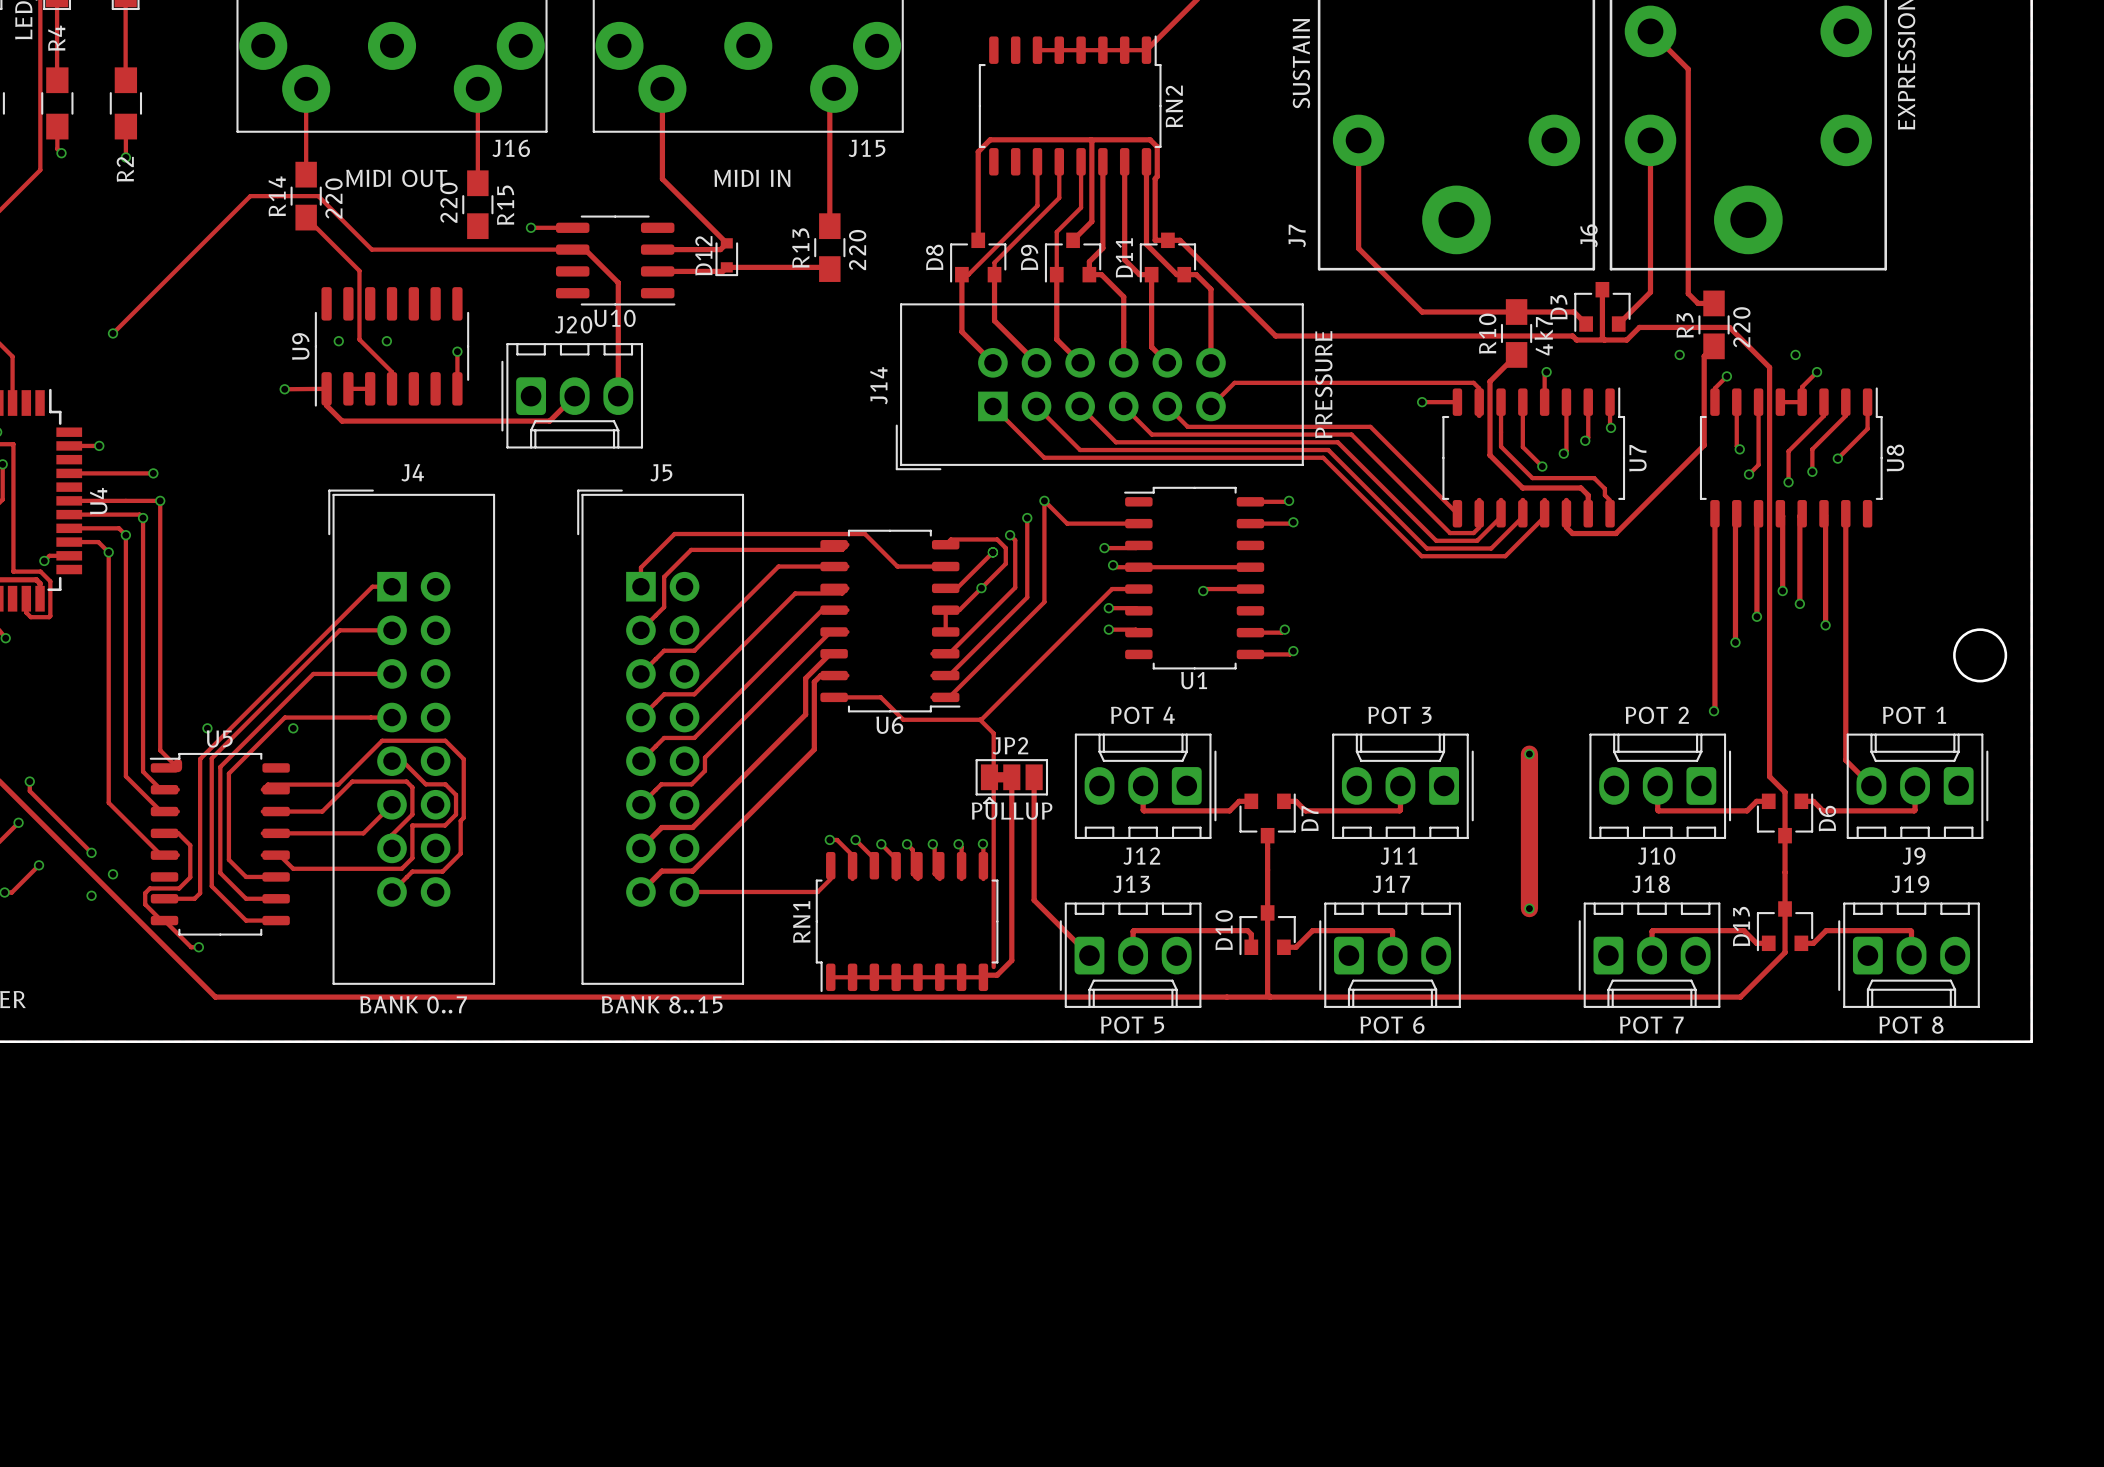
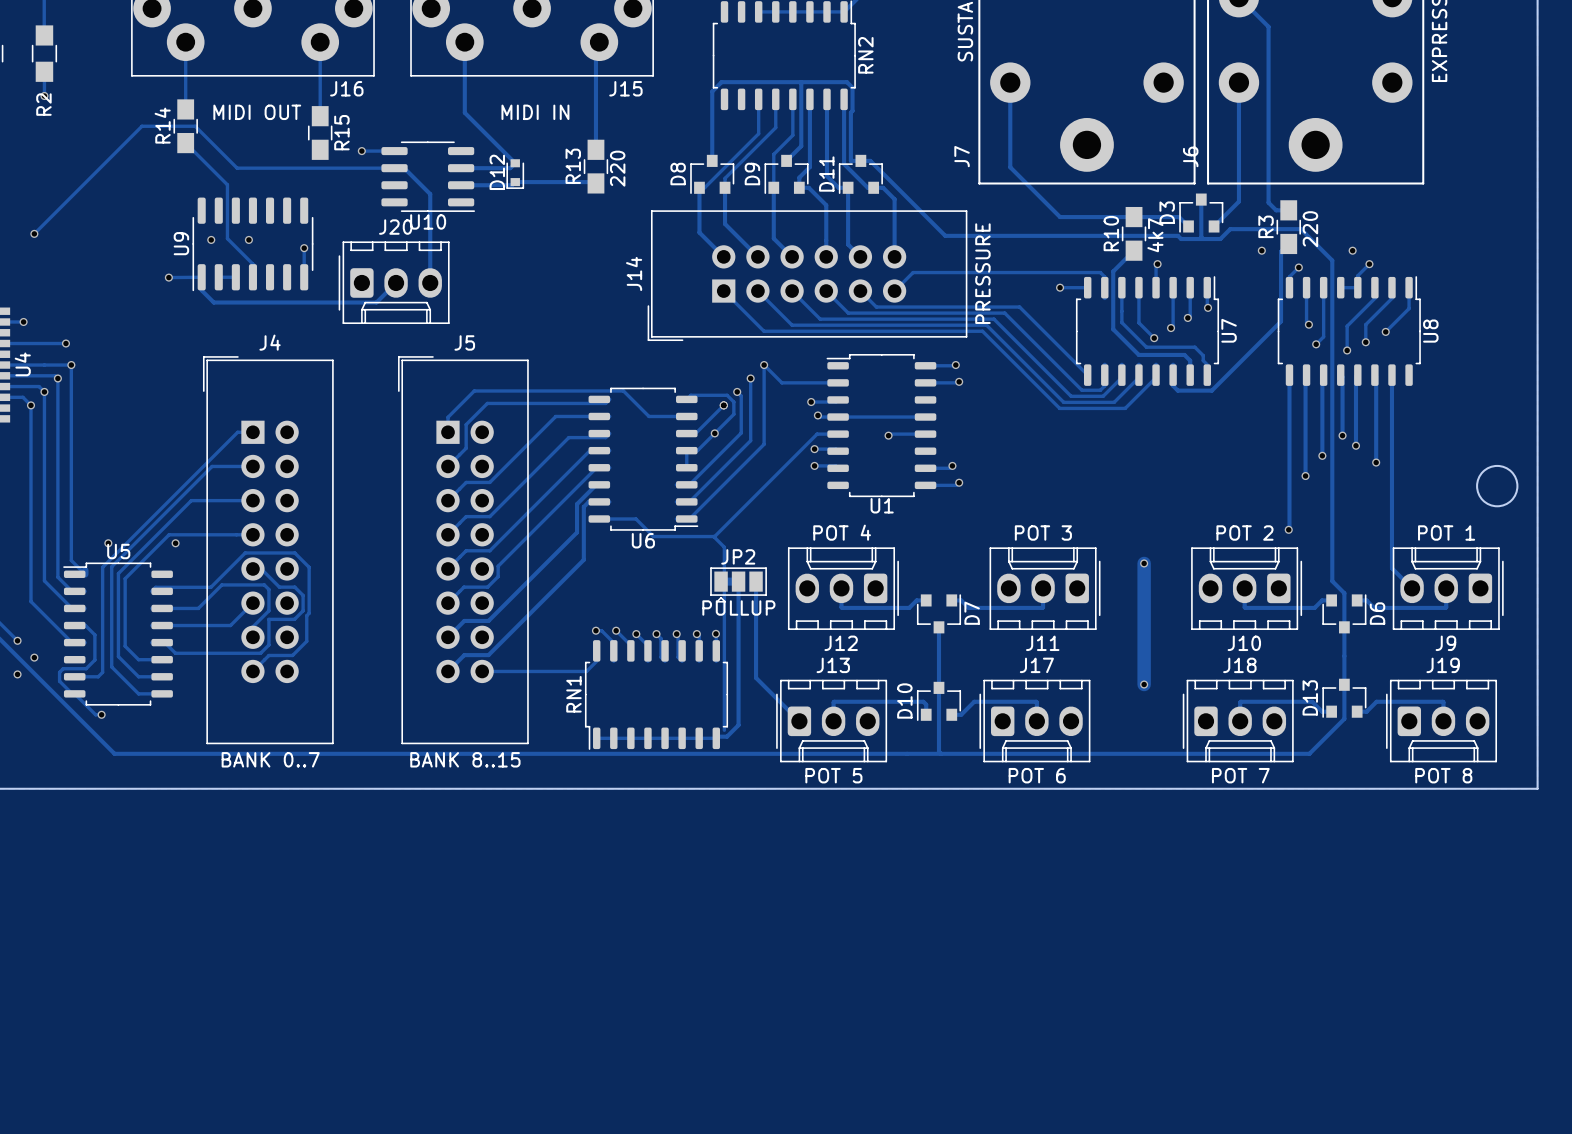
R14 value: 220 (333, 198) -> none
R15 value: 220 (448, 202) -> none

